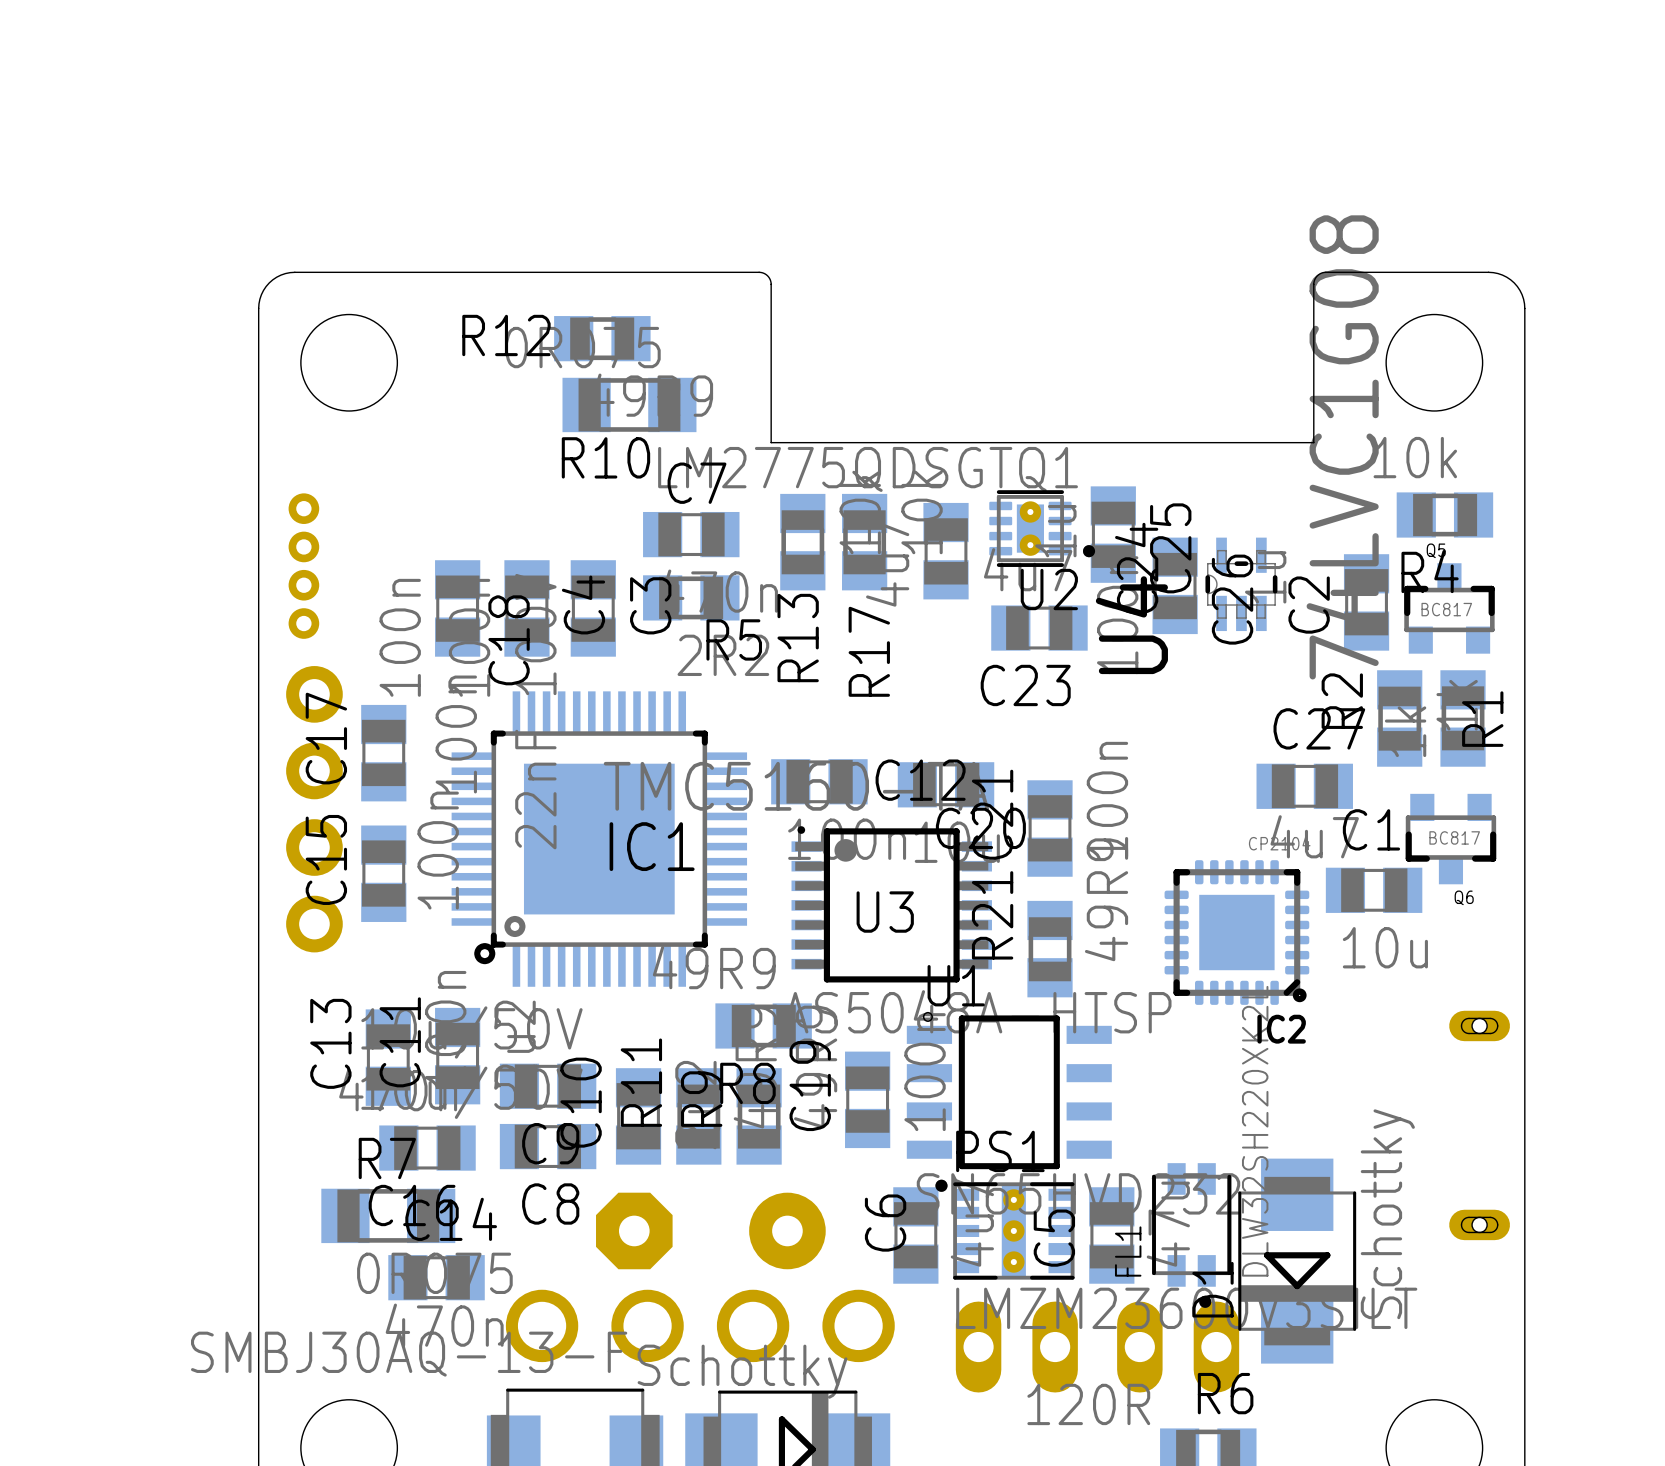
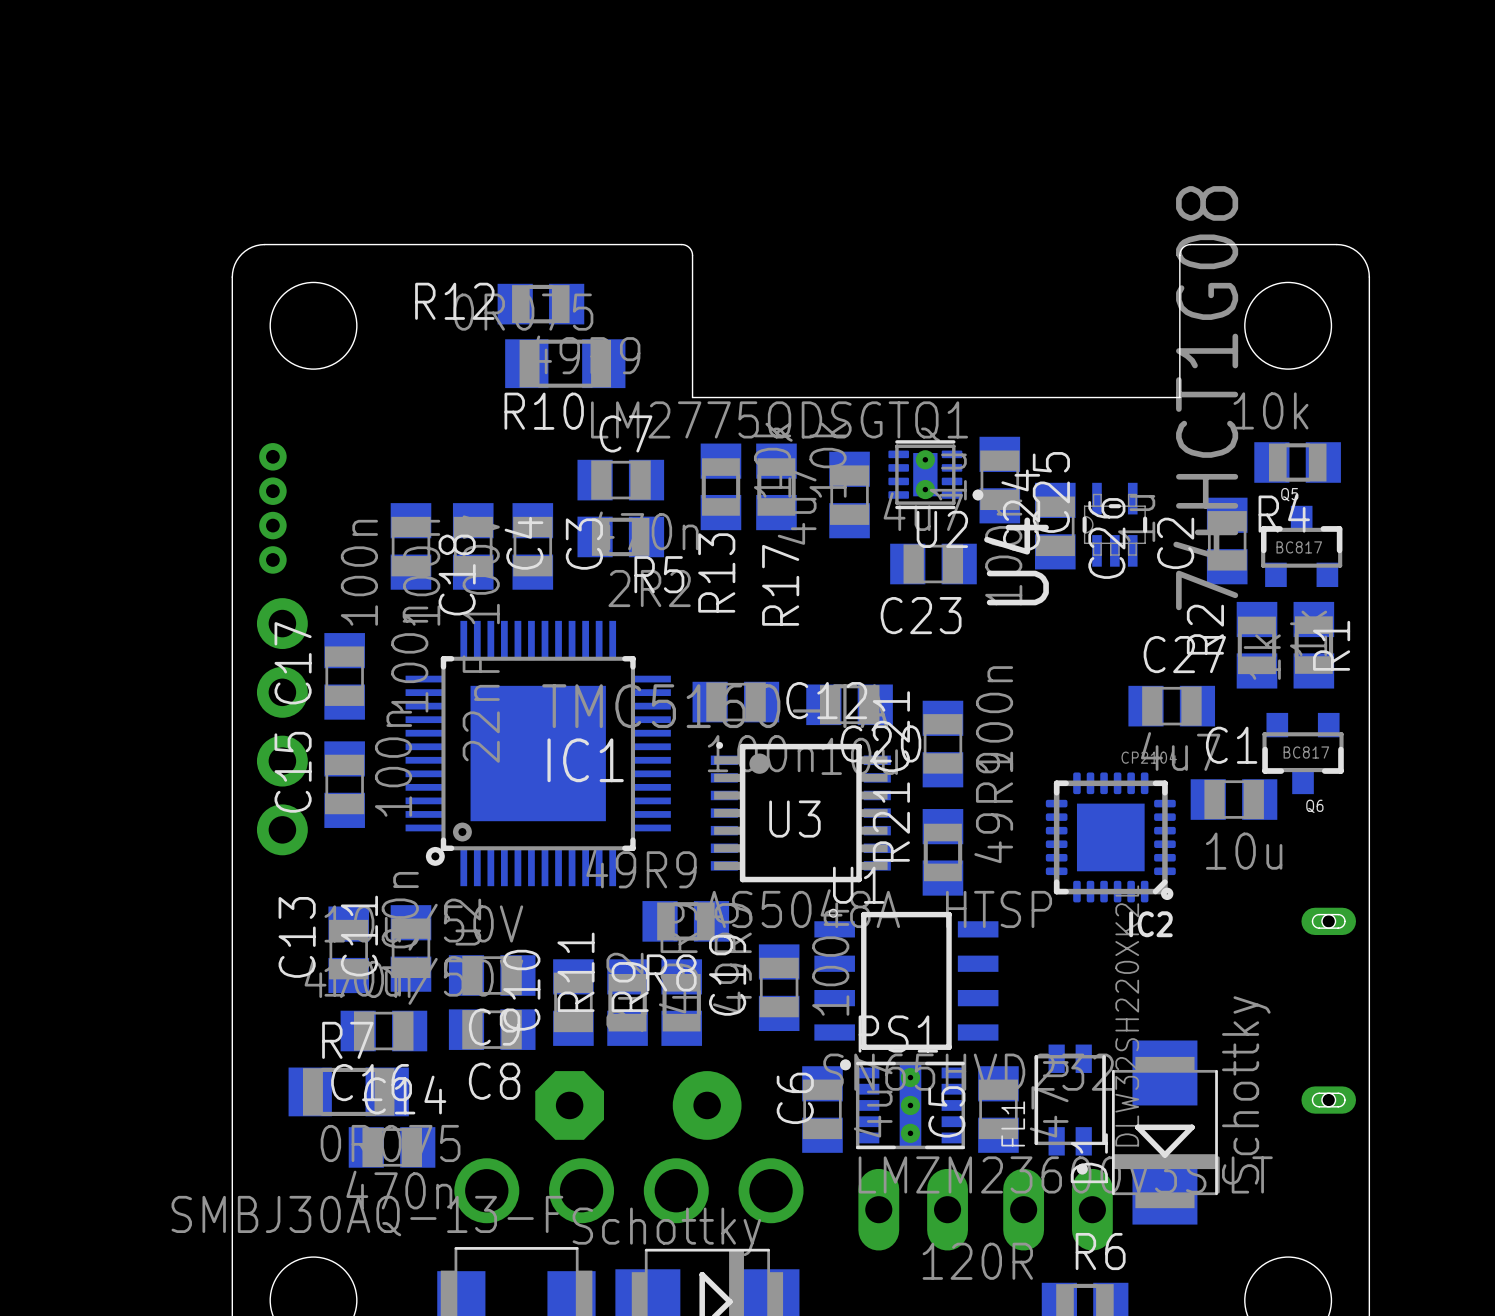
U4 value: 74LVC1G08 (1342, 447) -> 74HCT1G08 (1205, 398)

